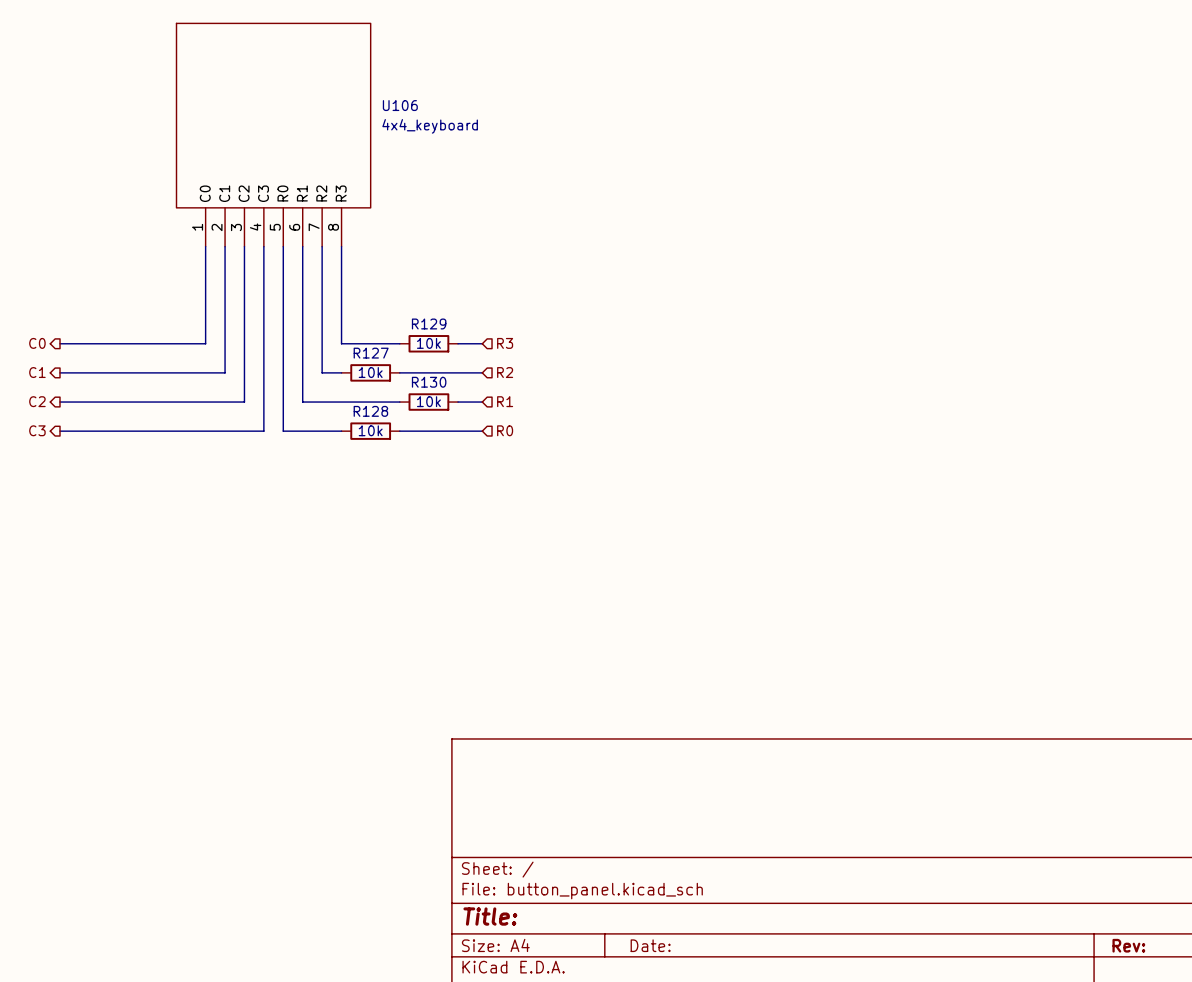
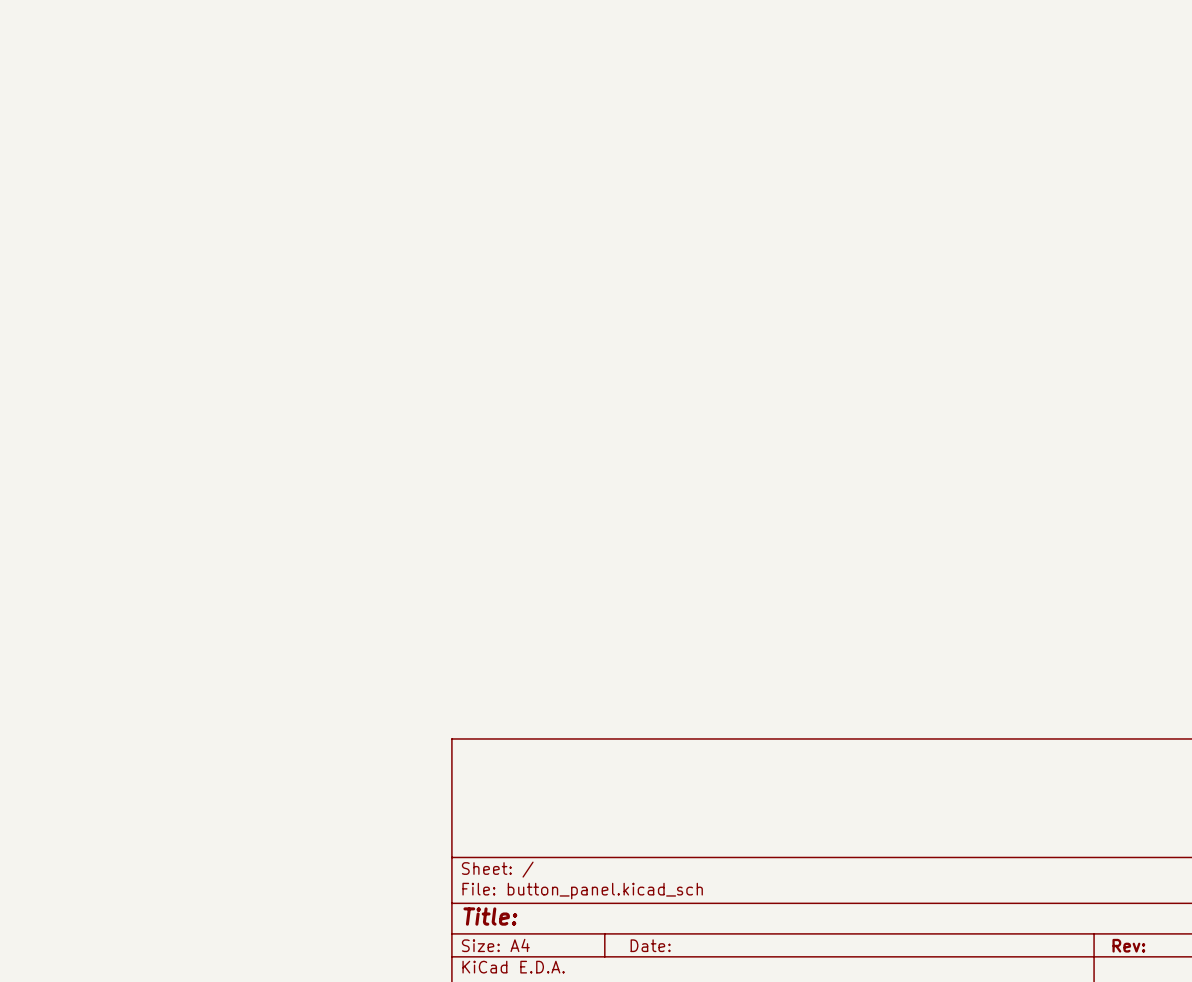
U106: 4x4_keyboard (273, 135) -> none
wire: (205, 246) (205, 343) (60, 343) -> none
wire: (225, 246) (225, 372) (60, 372) -> none
wire: (244, 246) (244, 402) (60, 402) -> none
wire: (263, 246) (263, 431) (60, 431) -> none
wire: (283, 246) (283, 431) (341, 431) -> none
wire: (302, 246) (302, 402) (399, 402) -> none
wire: (322, 246) (322, 372) (341, 372) -> none
wire: (341, 246) (341, 343) (399, 343) -> none
hierarchical label: C0 (37, 343) -> none
R129: 10k (428, 343) -> none
wire: (458, 343) (482, 343) -> none
hierarchical label: R3 (505, 343) -> none
hierarchical label: C1 (37, 372) -> none
R127: 10k (370, 372) -> none
wire: (399, 372) (482, 372) -> none
hierarchical label: R2 (505, 372) -> none
hierarchical label: C2 (37, 401) -> none
hierarchical label: R1 (505, 401) -> none
R130: 10k (428, 402) -> none
wire: (458, 402) (482, 402) -> none
hierarchical label: C3 (37, 430) -> none
hierarchical label: R0 (505, 430) -> none
R128: 10k (370, 431) -> none
wire: (399, 431) (482, 431) -> none

